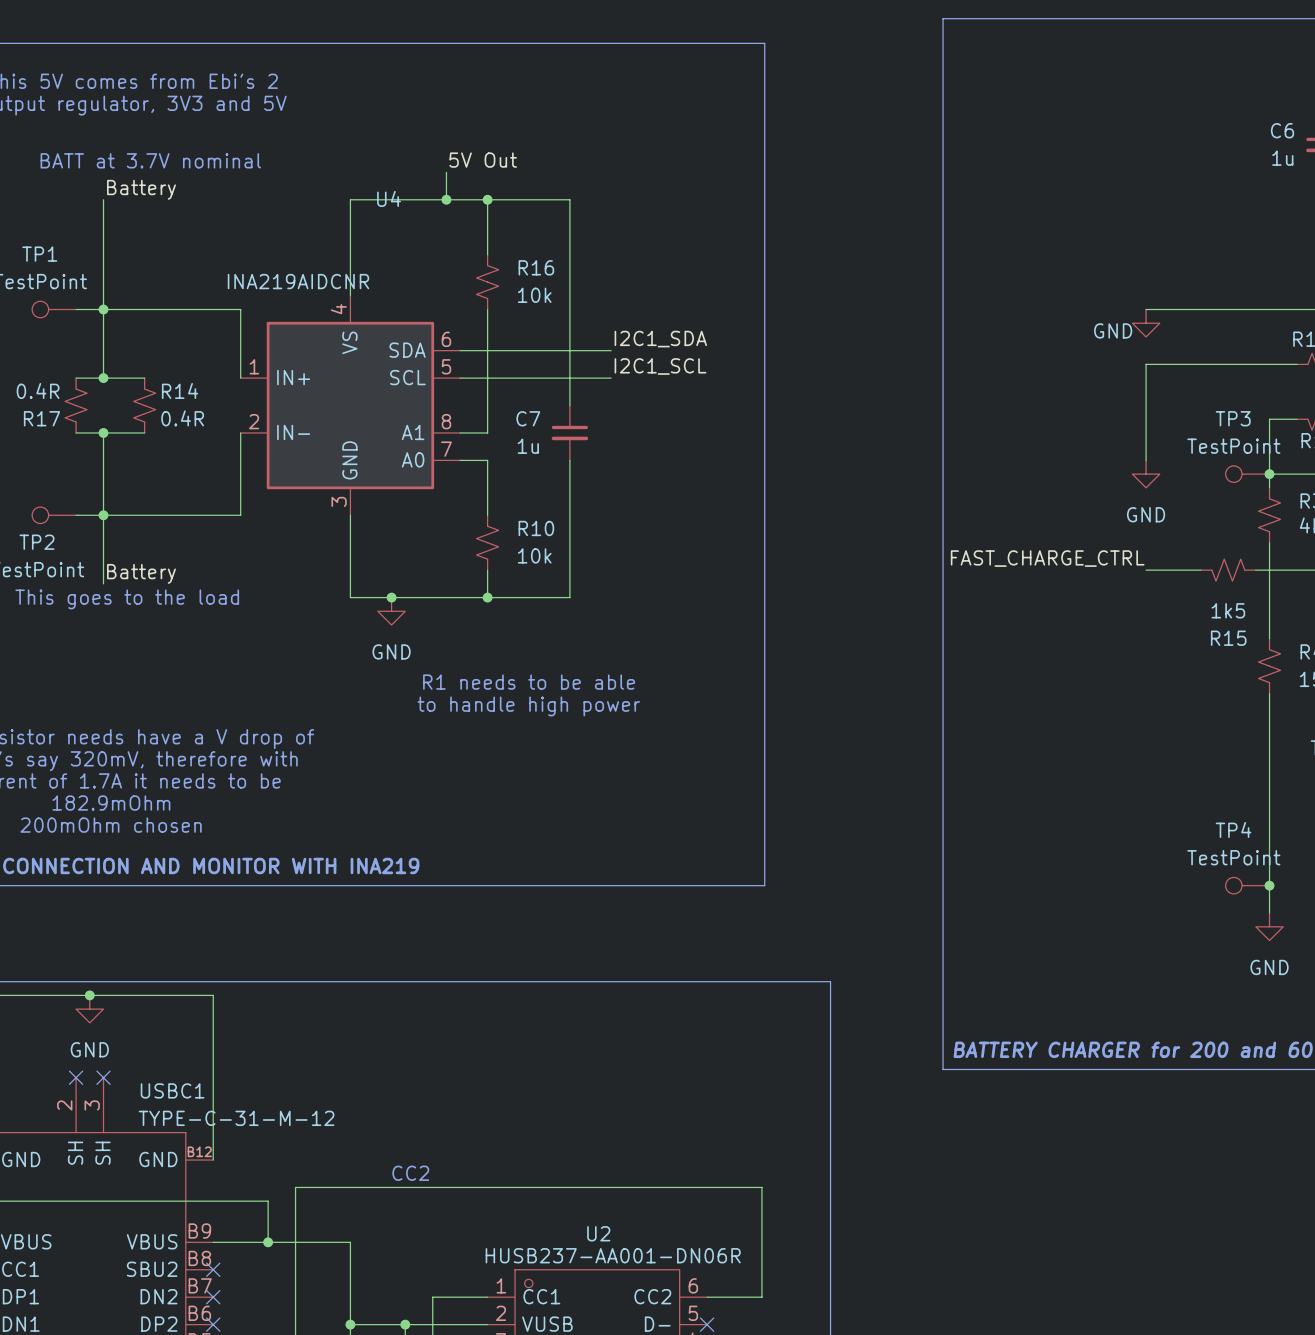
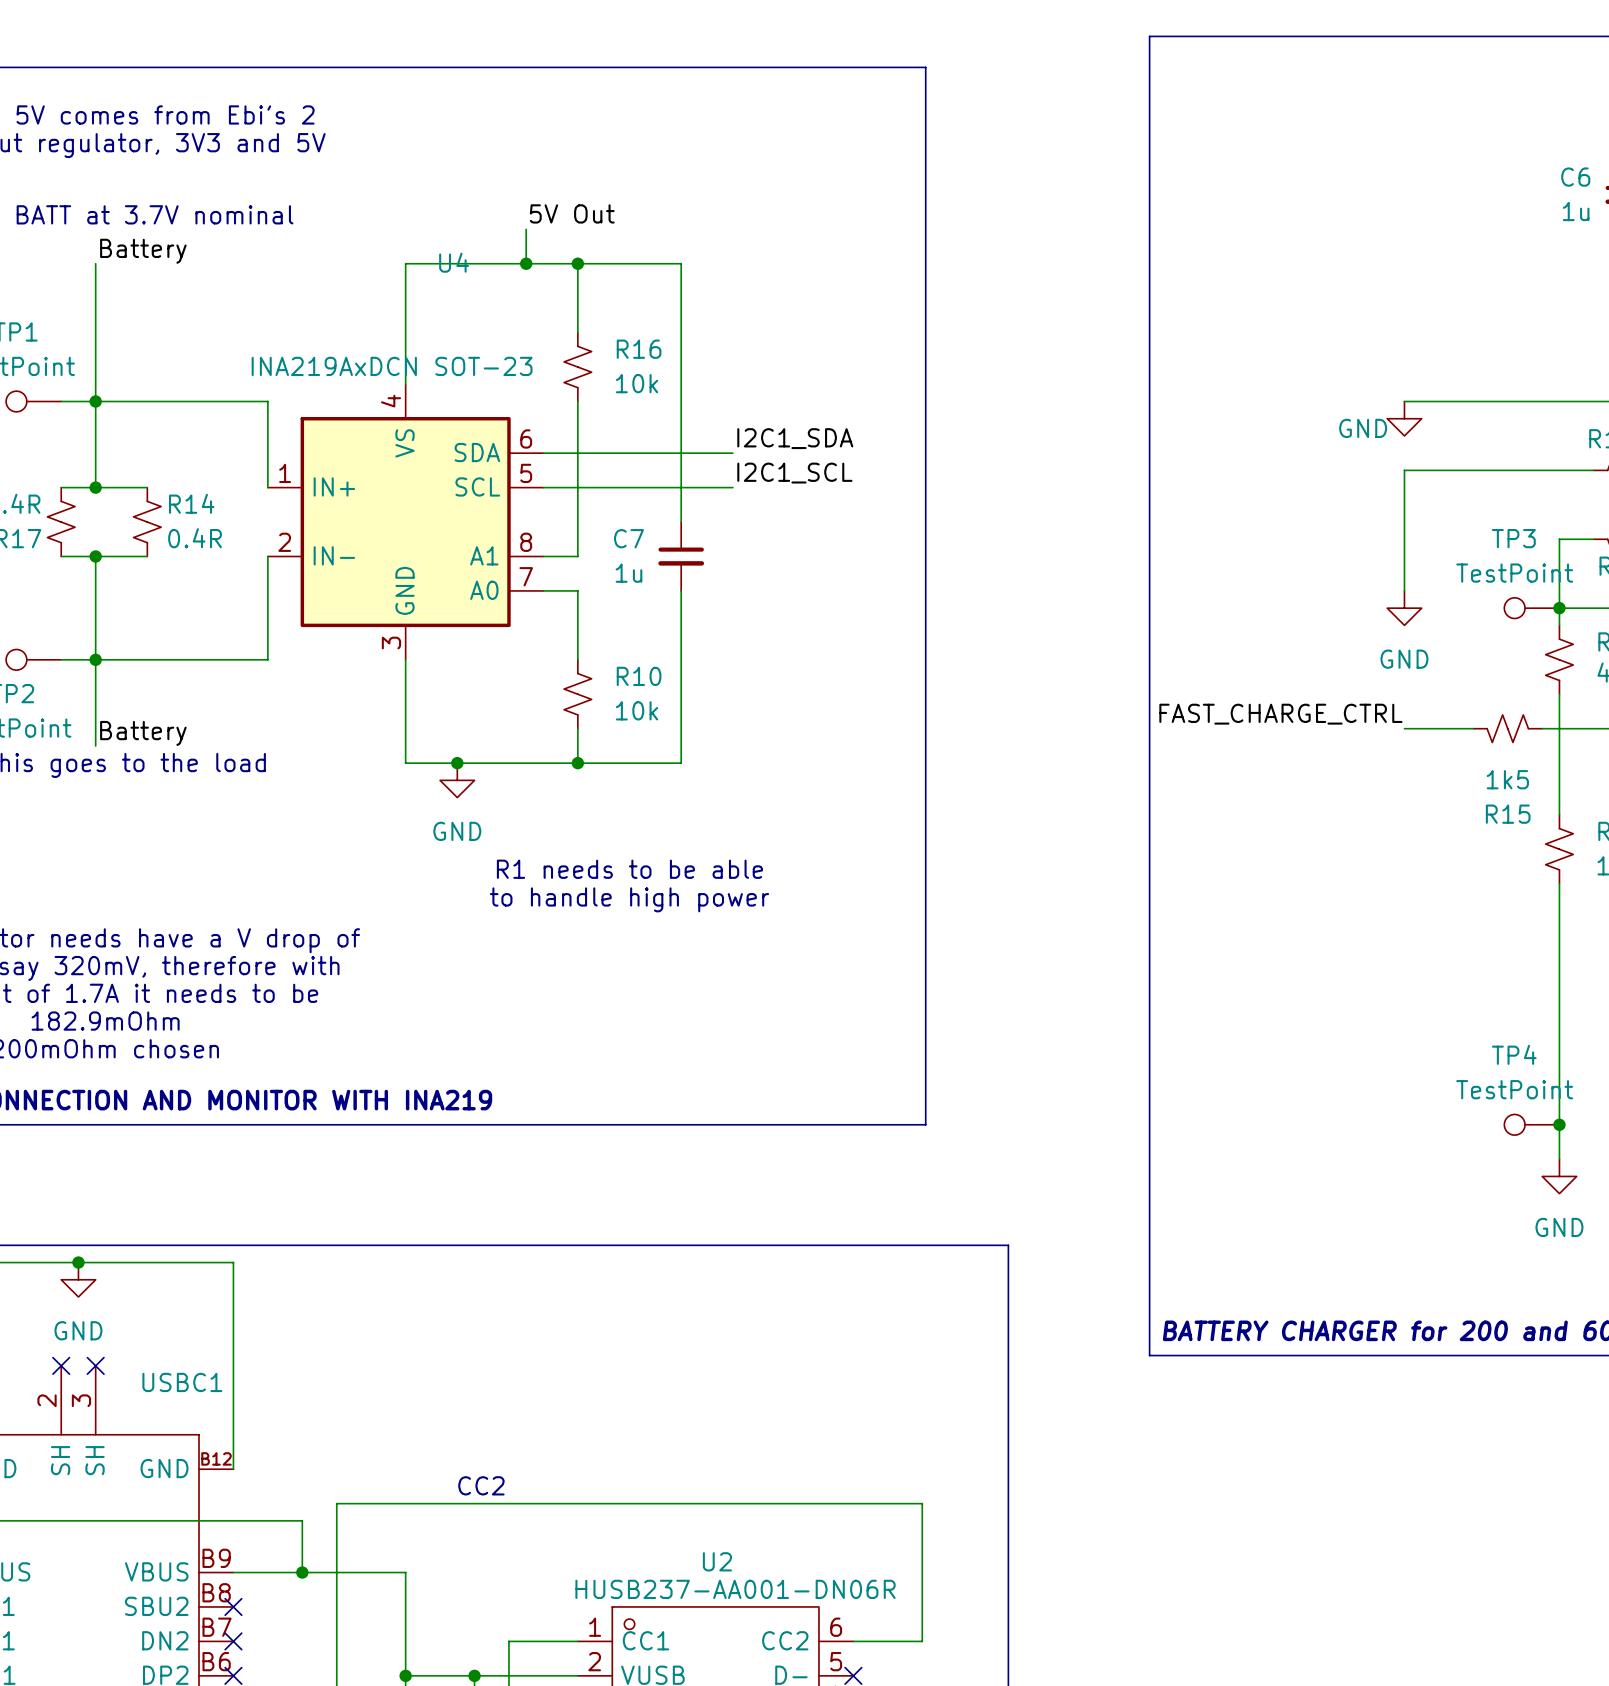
U4 value: INA219AIDCNR (298, 281) -> INA219AxDCN SOT-23 (392, 366)
USBC1 value: TYPE-C-31-M-12 (236, 1118) -> none

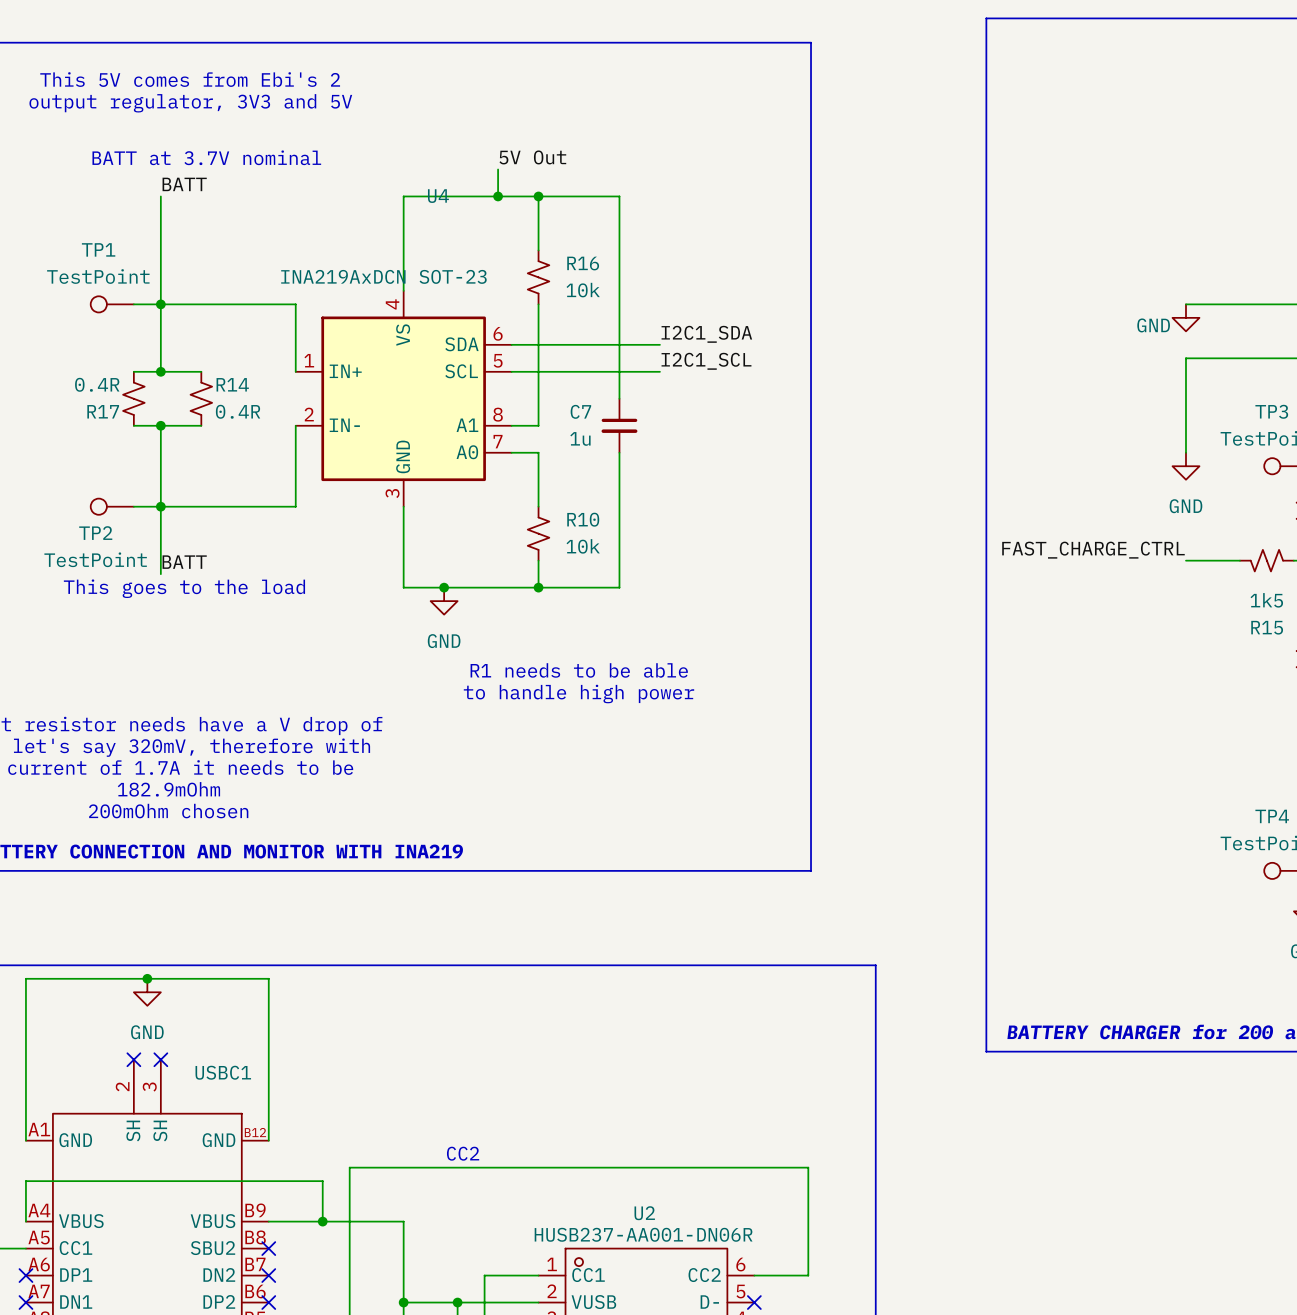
label: Battery (143, 251) -> BATT (184, 184)
label: Battery (143, 733) -> BATT (184, 562)

